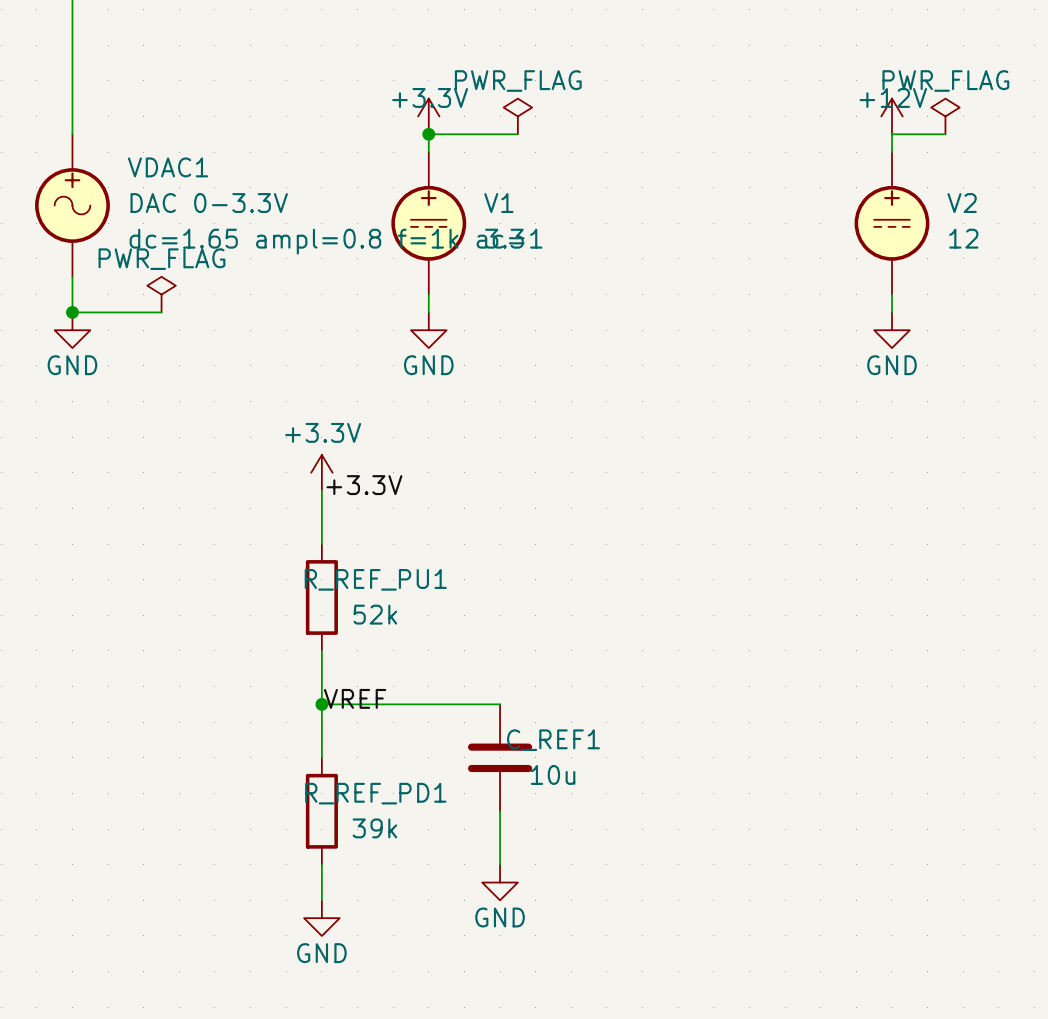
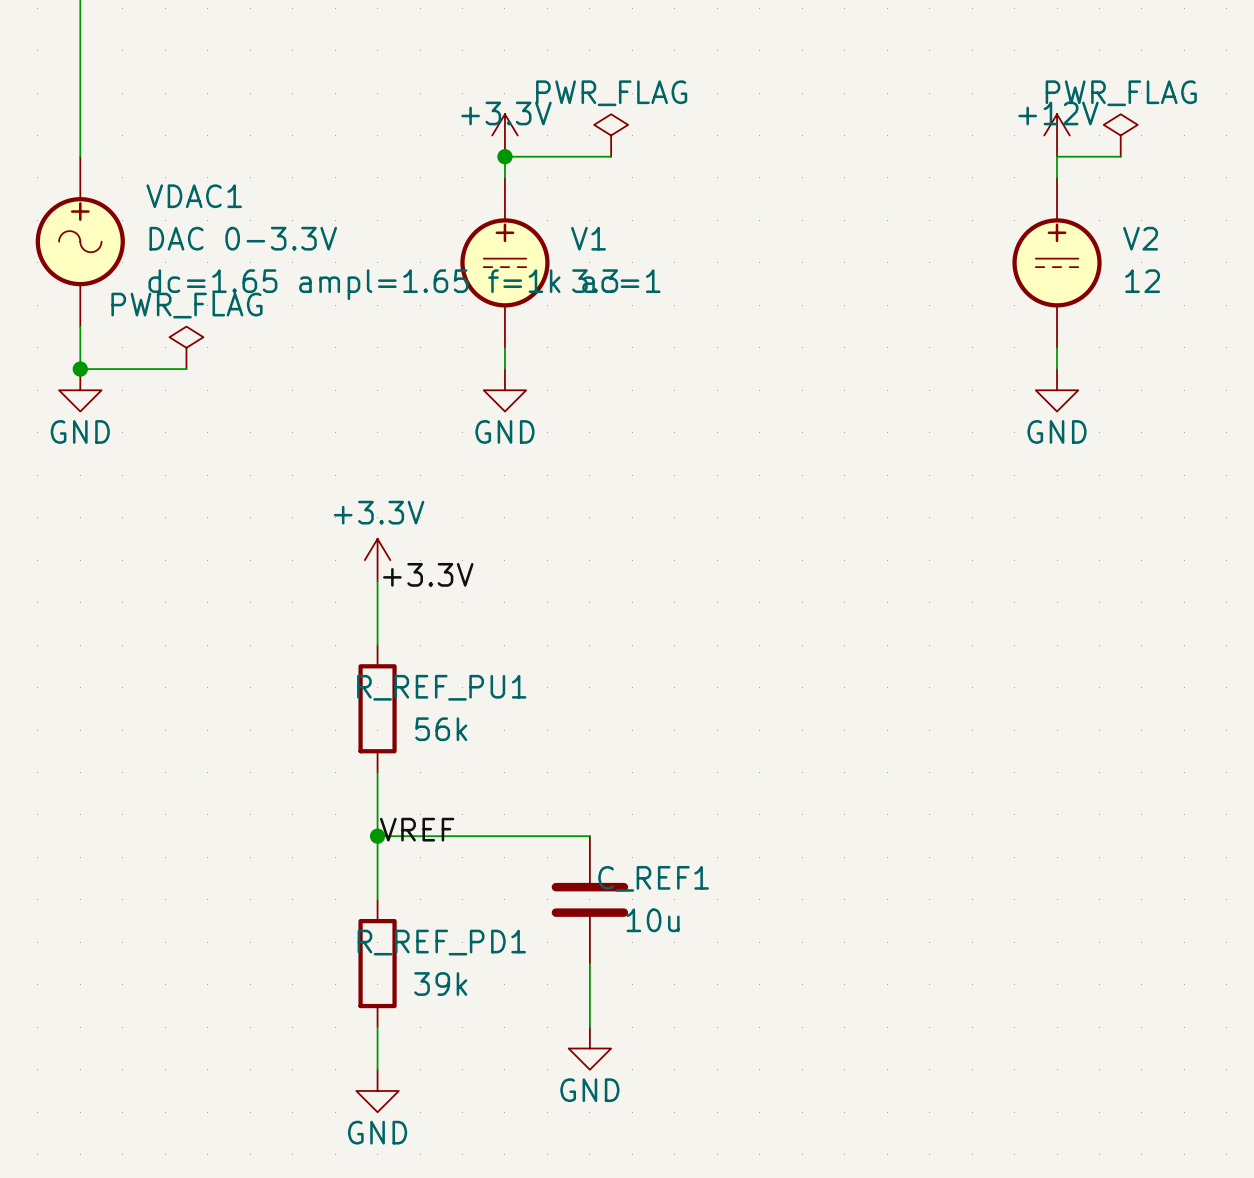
VDAC1 text: dc=1.65 ampl=0.8 f=1k ac=1 (336, 241) -> dc=1.65 ampl=1.65 f=1k ac=1 (404, 284)
R_REF_PU1 value: 52k (375, 614) -> 56k (441, 729)

